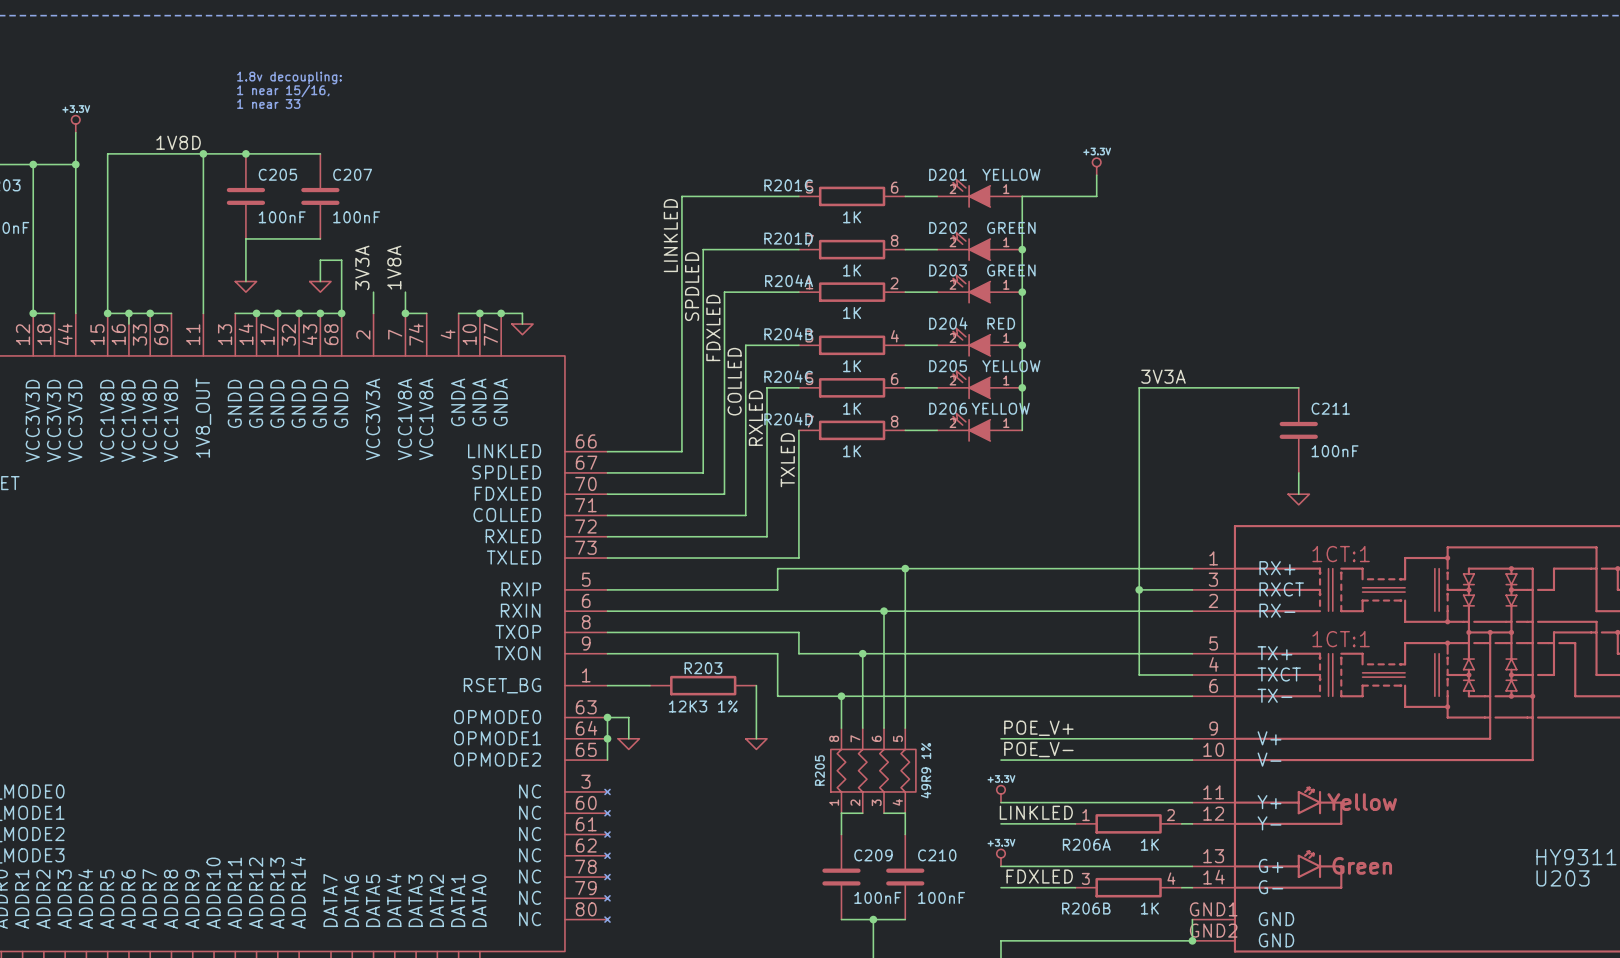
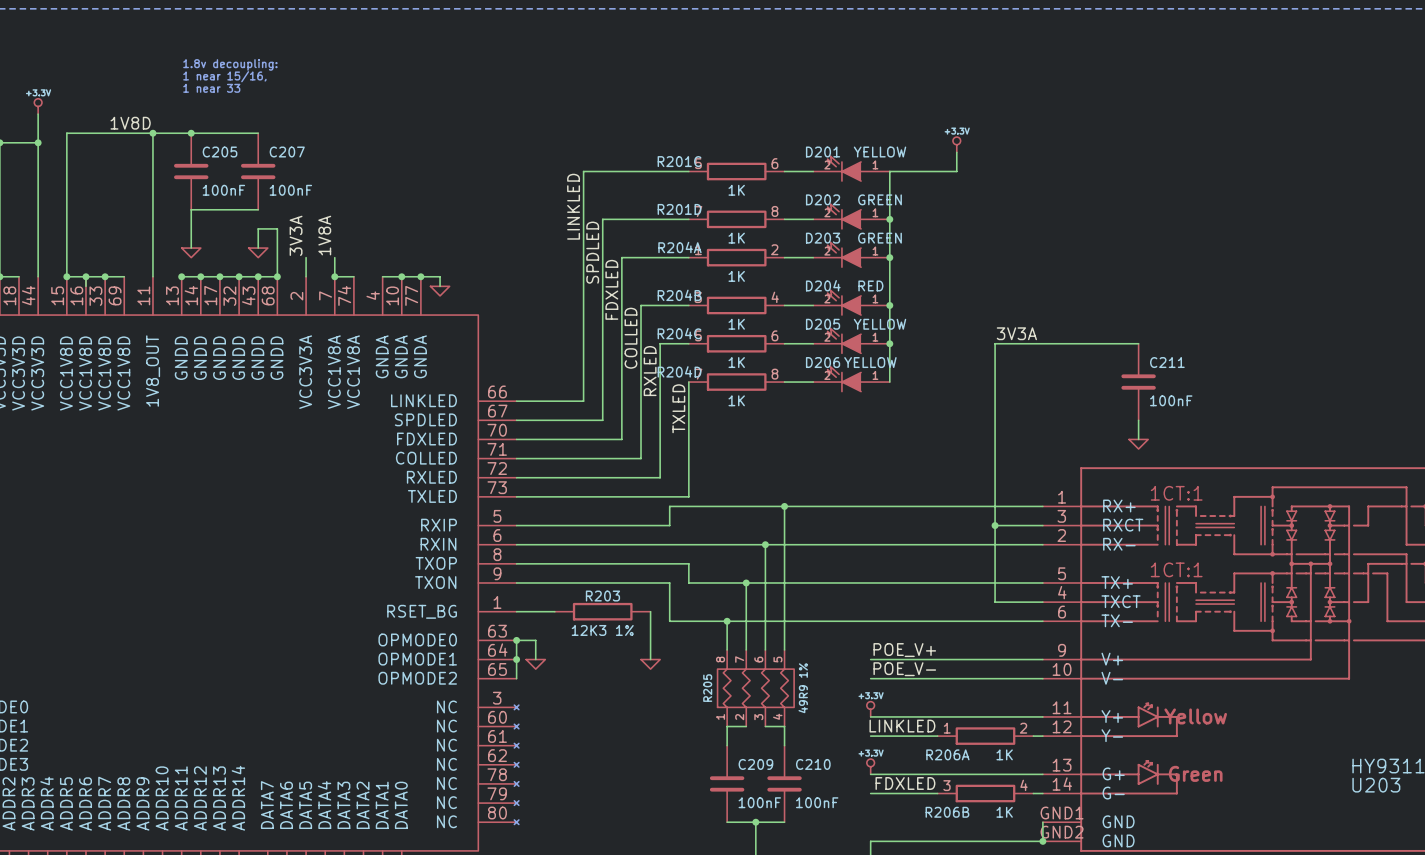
junction: none -> (181, 276)

